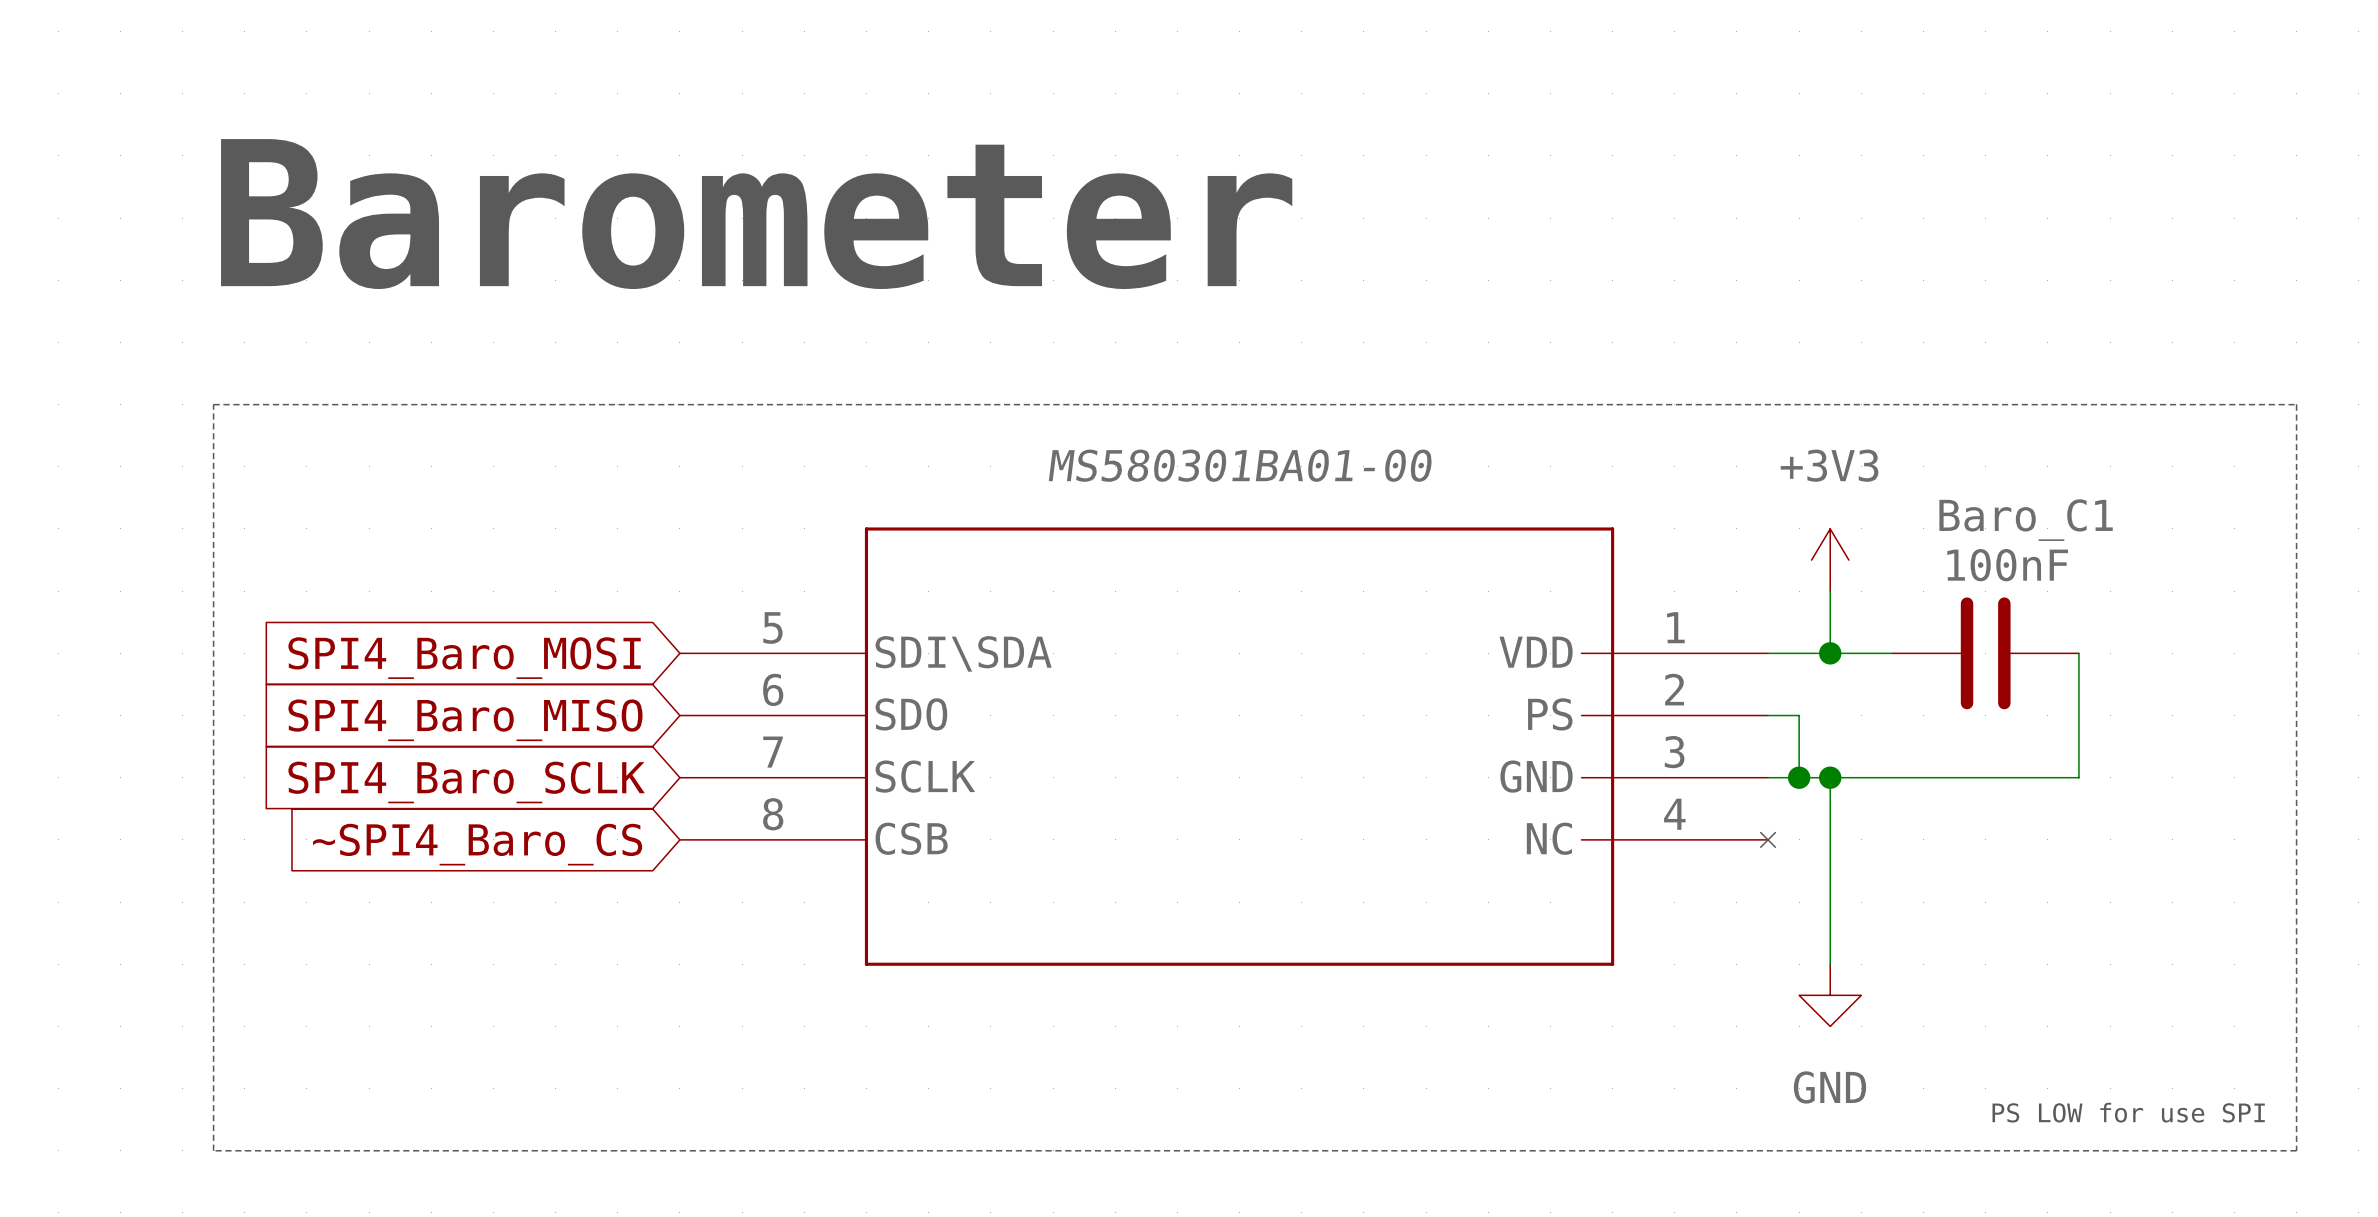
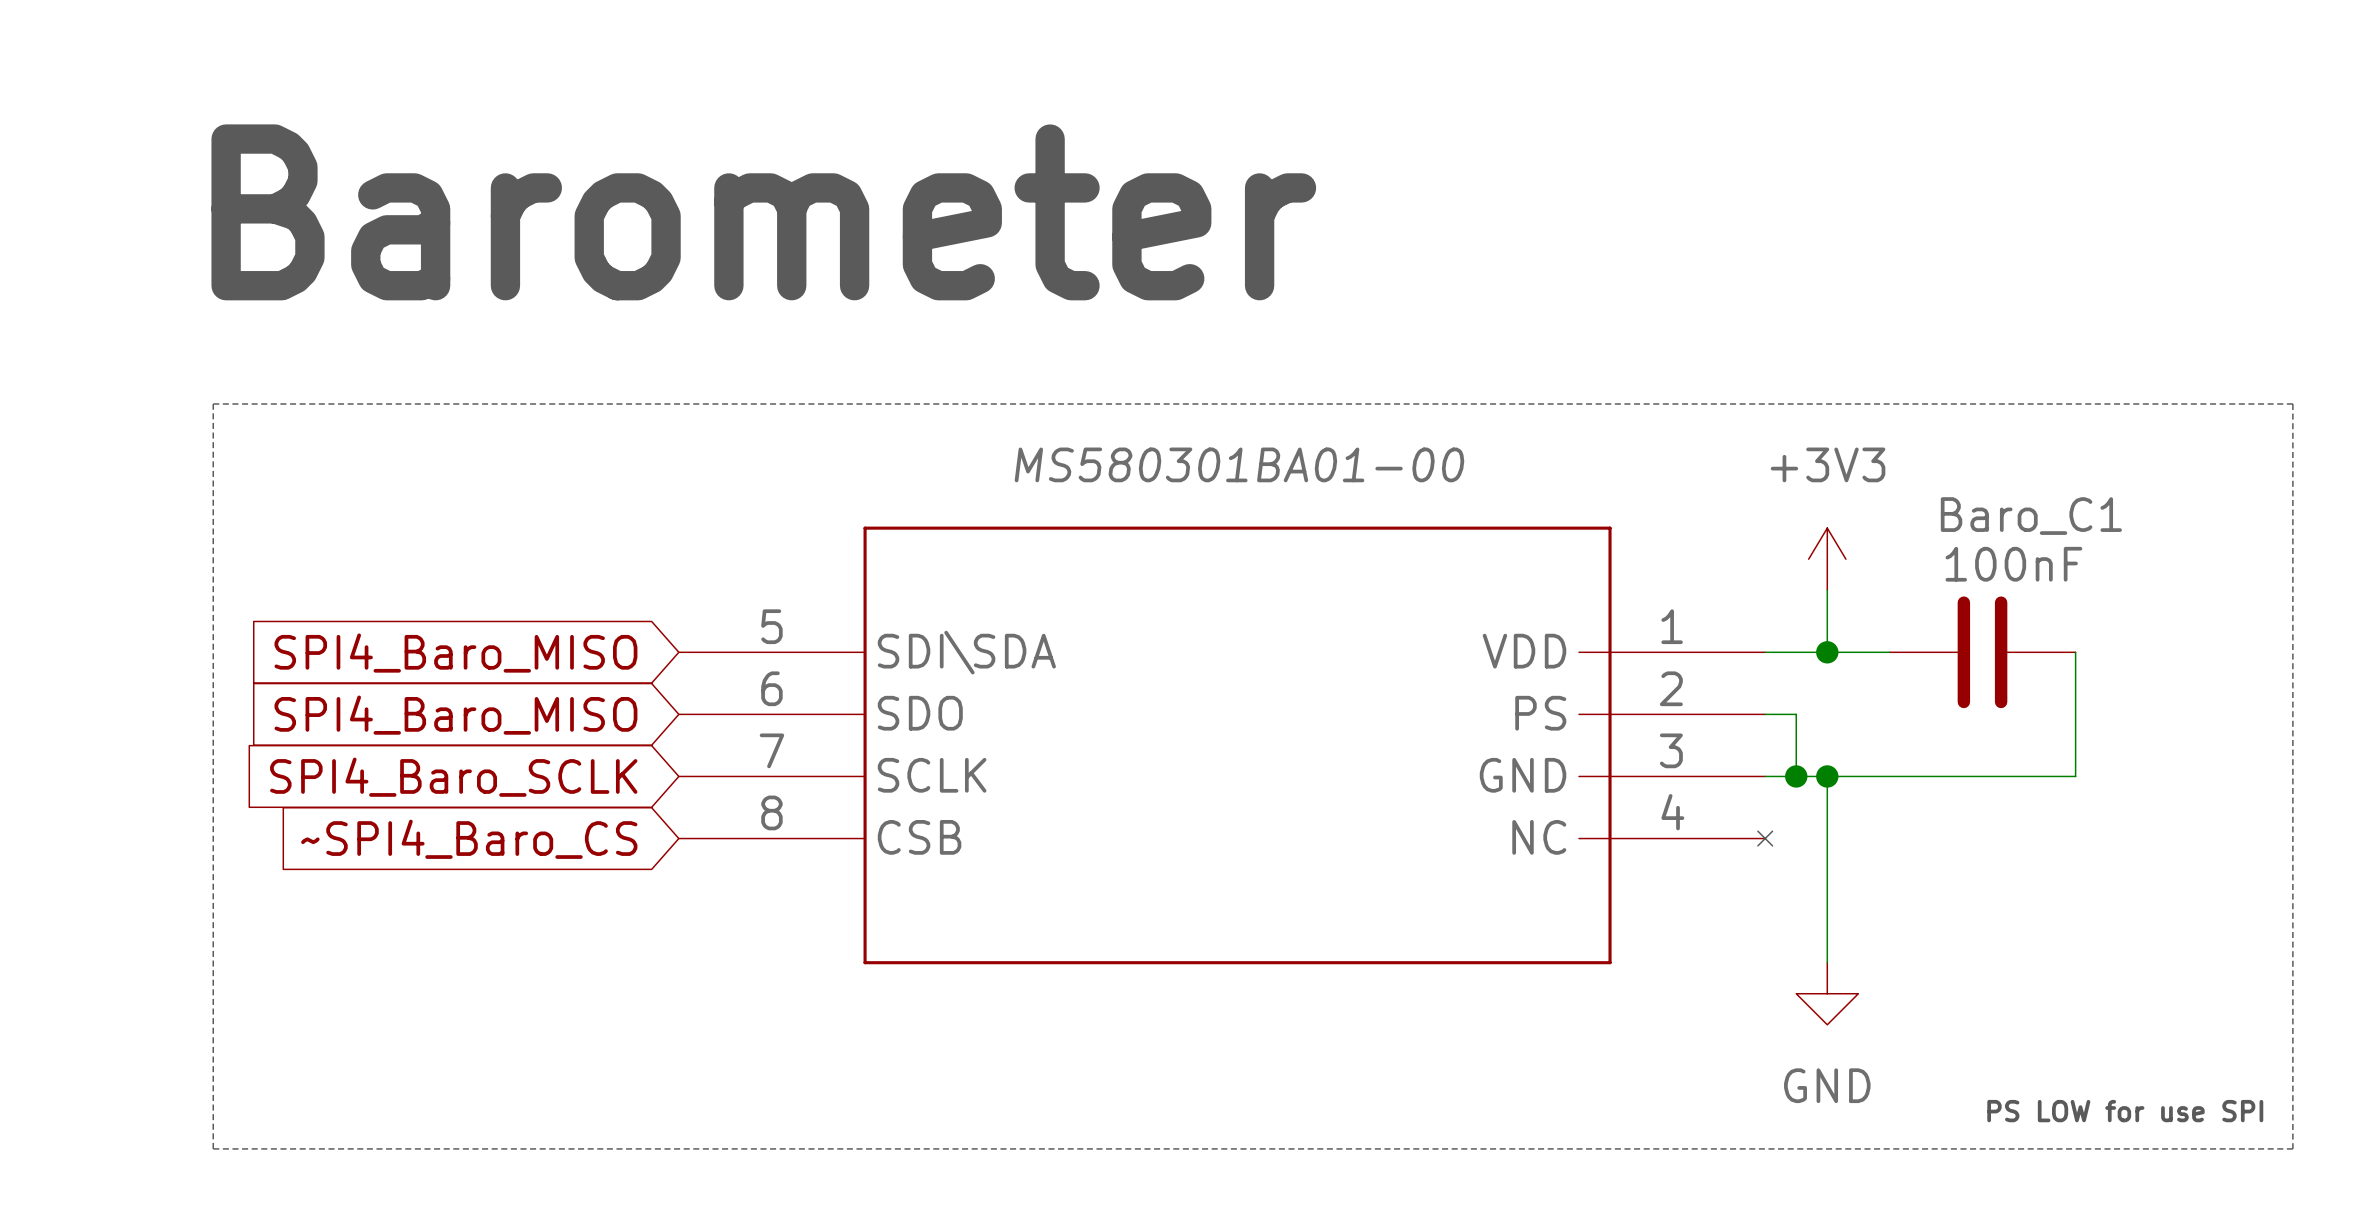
global label: SPI4_Baro_MOSI (464, 658) -> SPI4_Baro_MISO (455, 653)

